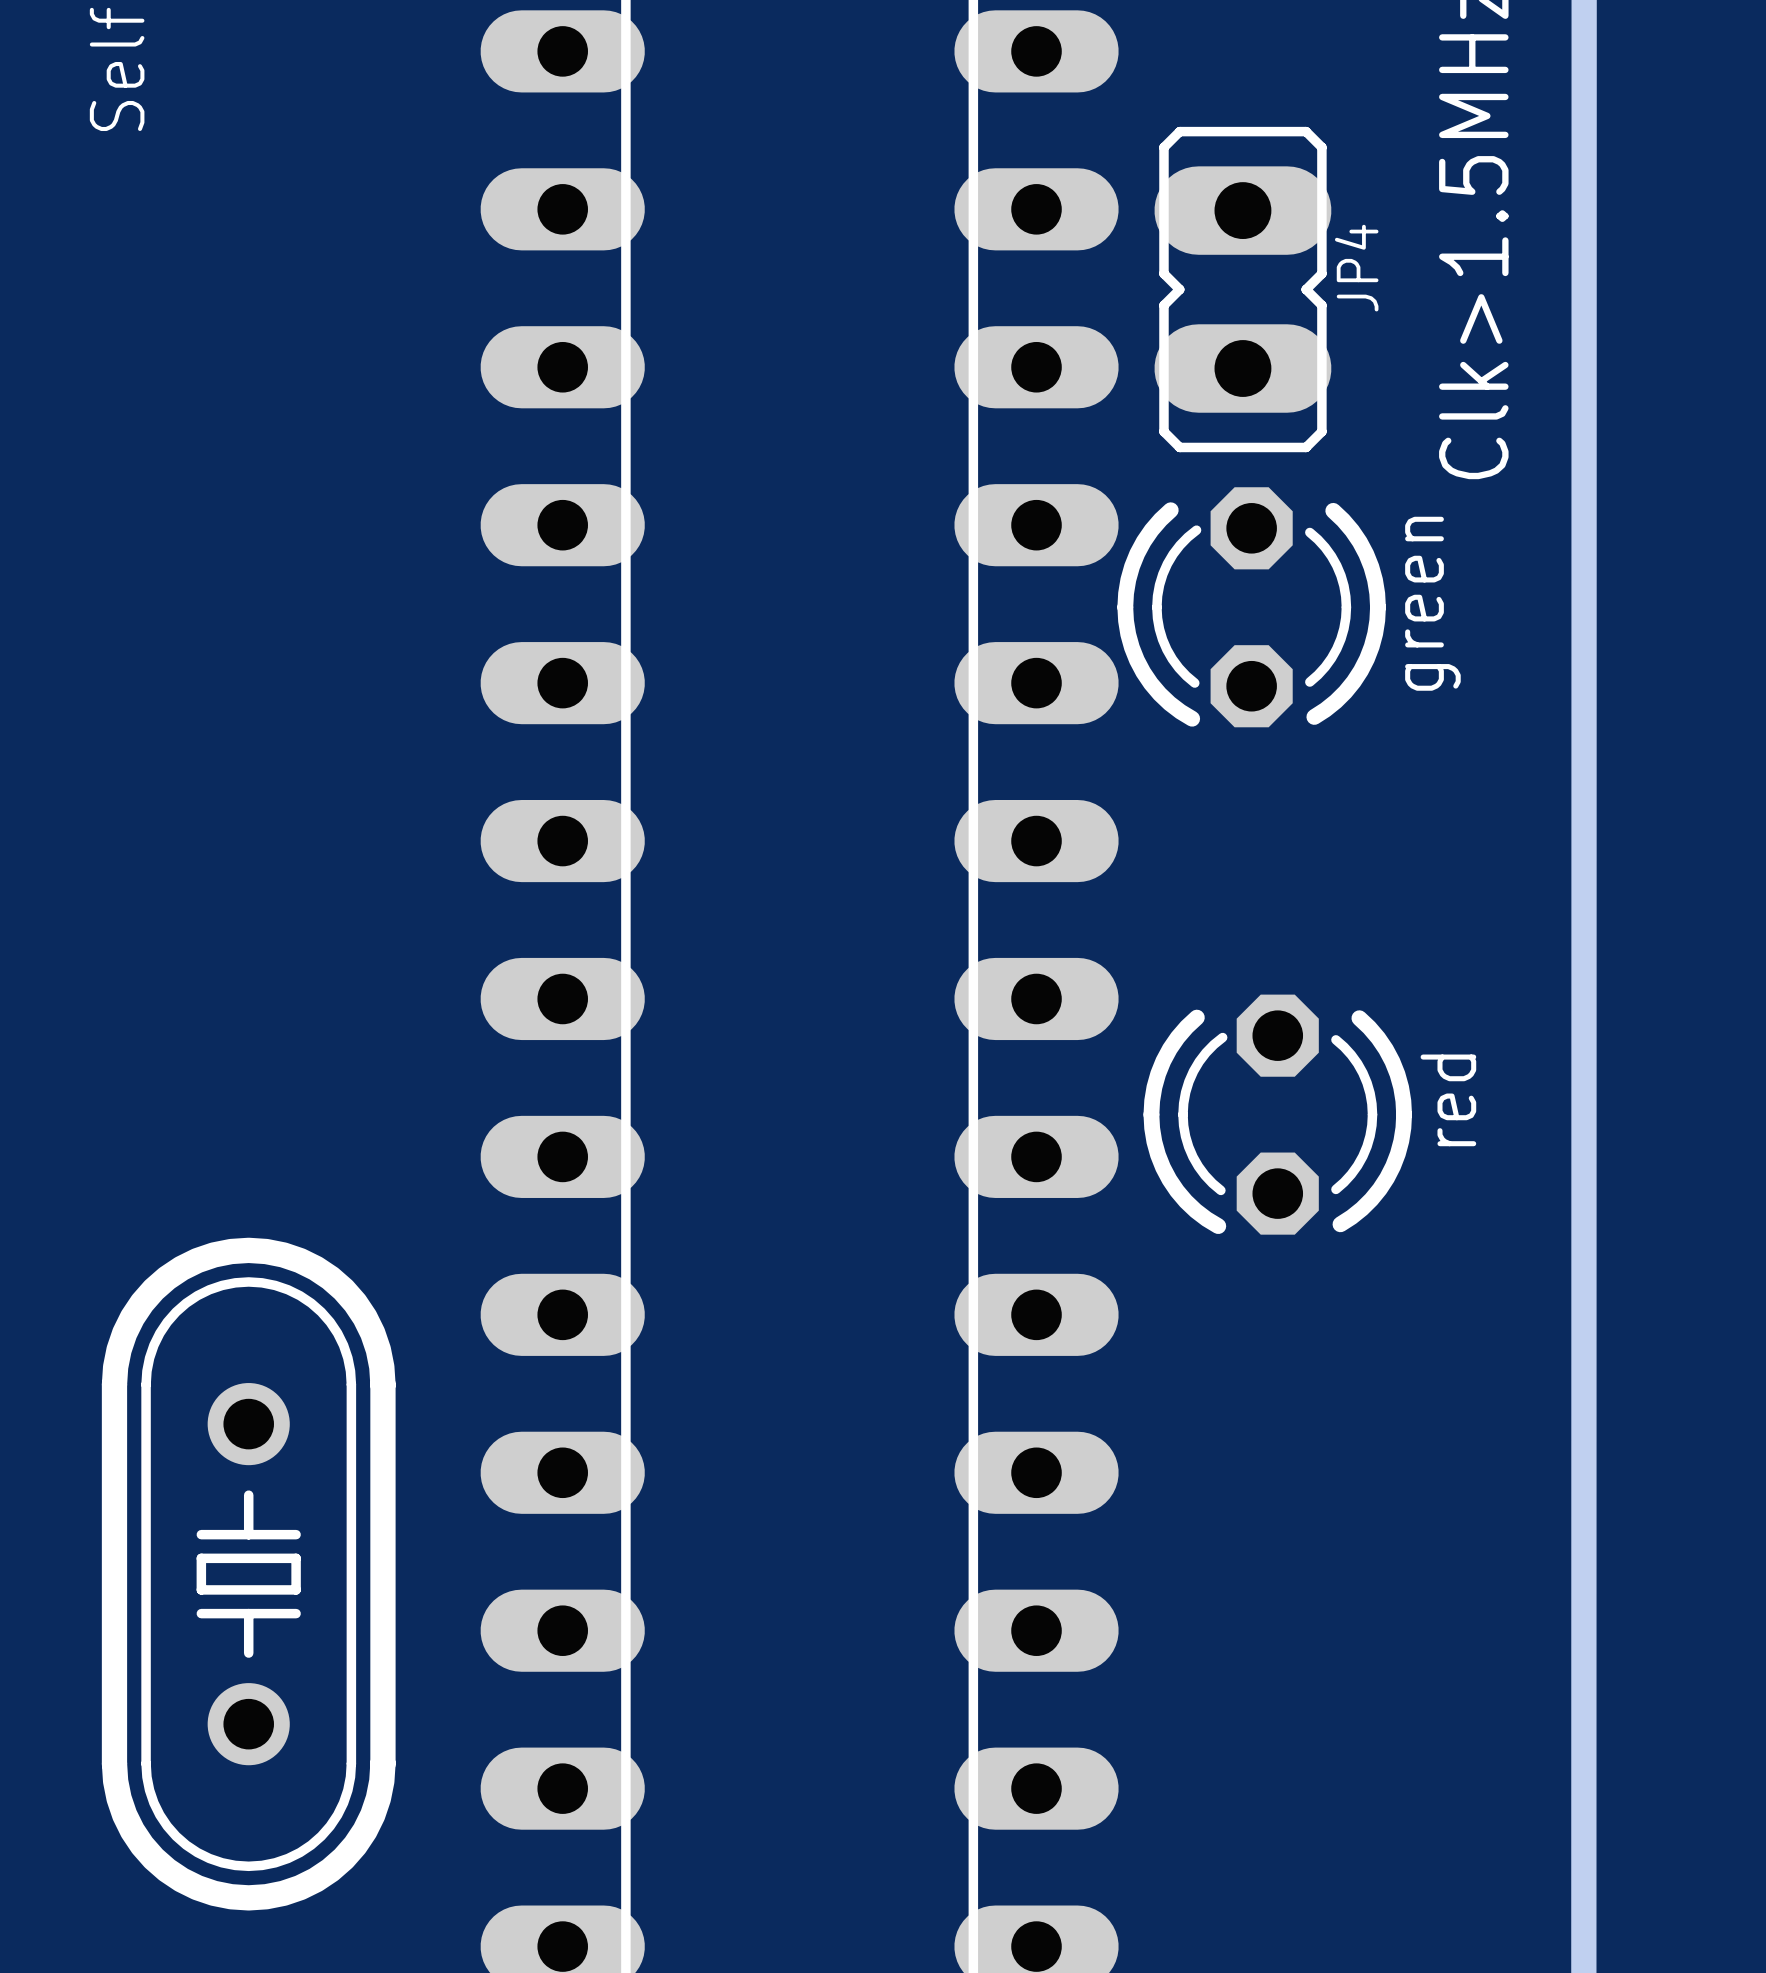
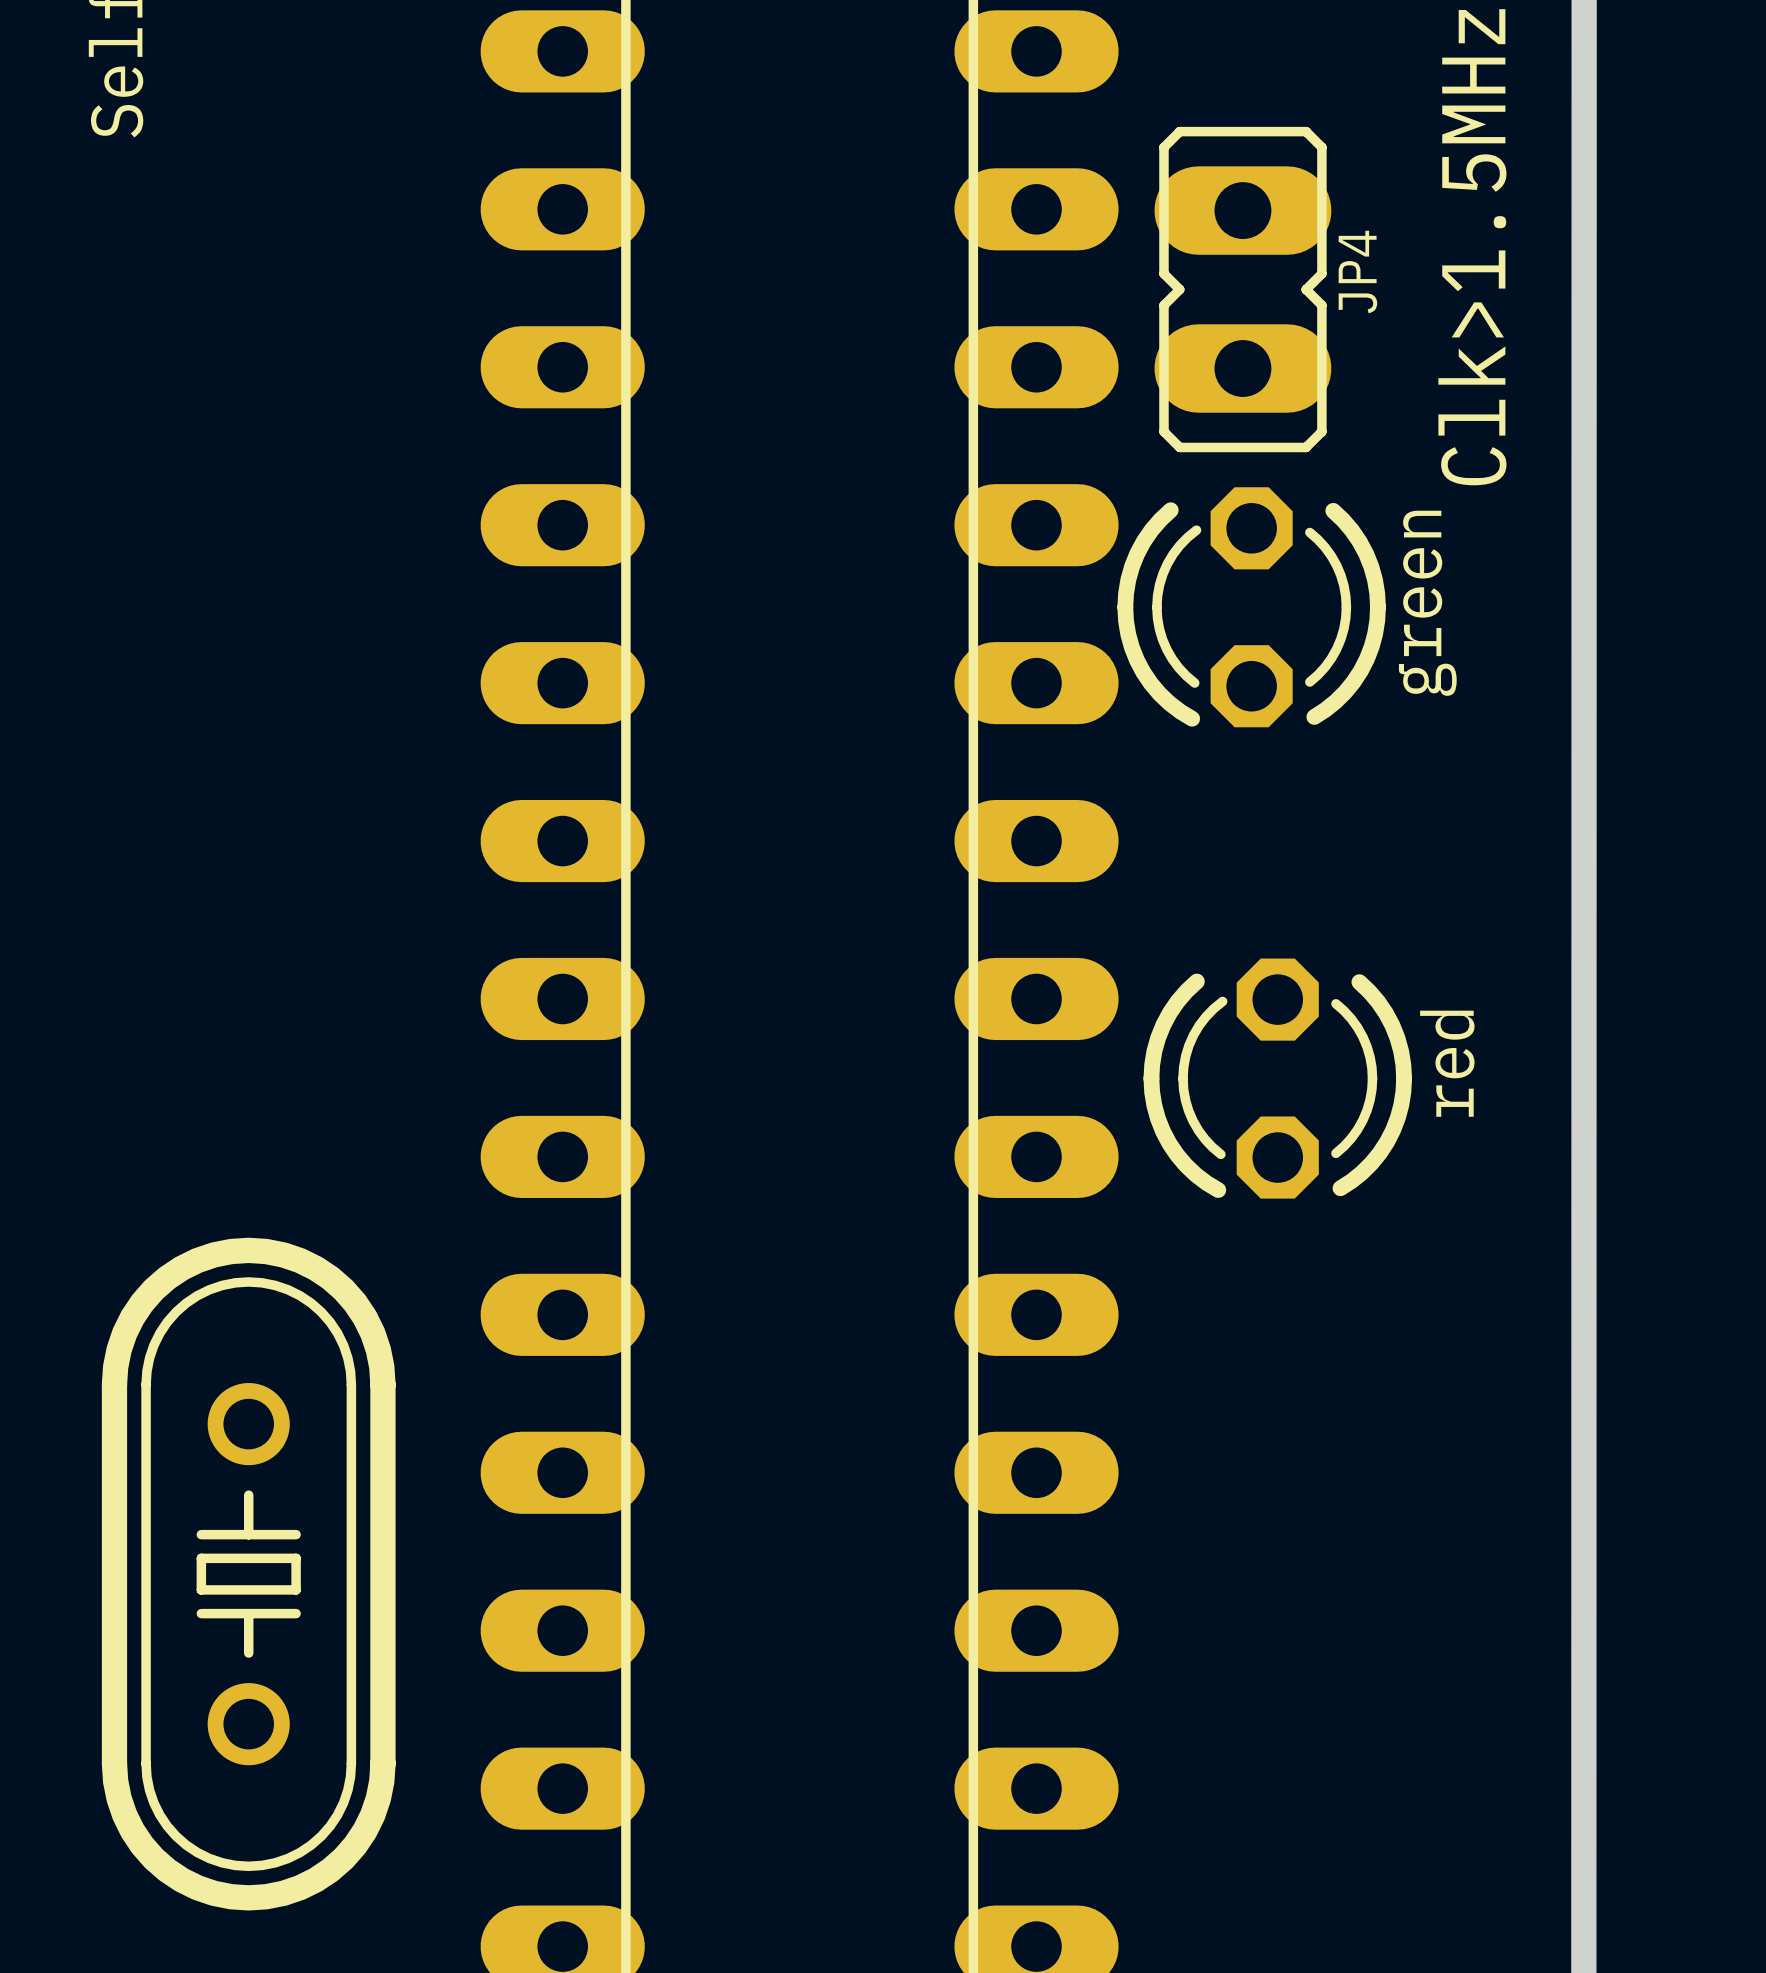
part position: (1277, 1114) -> (1277, 1078)

